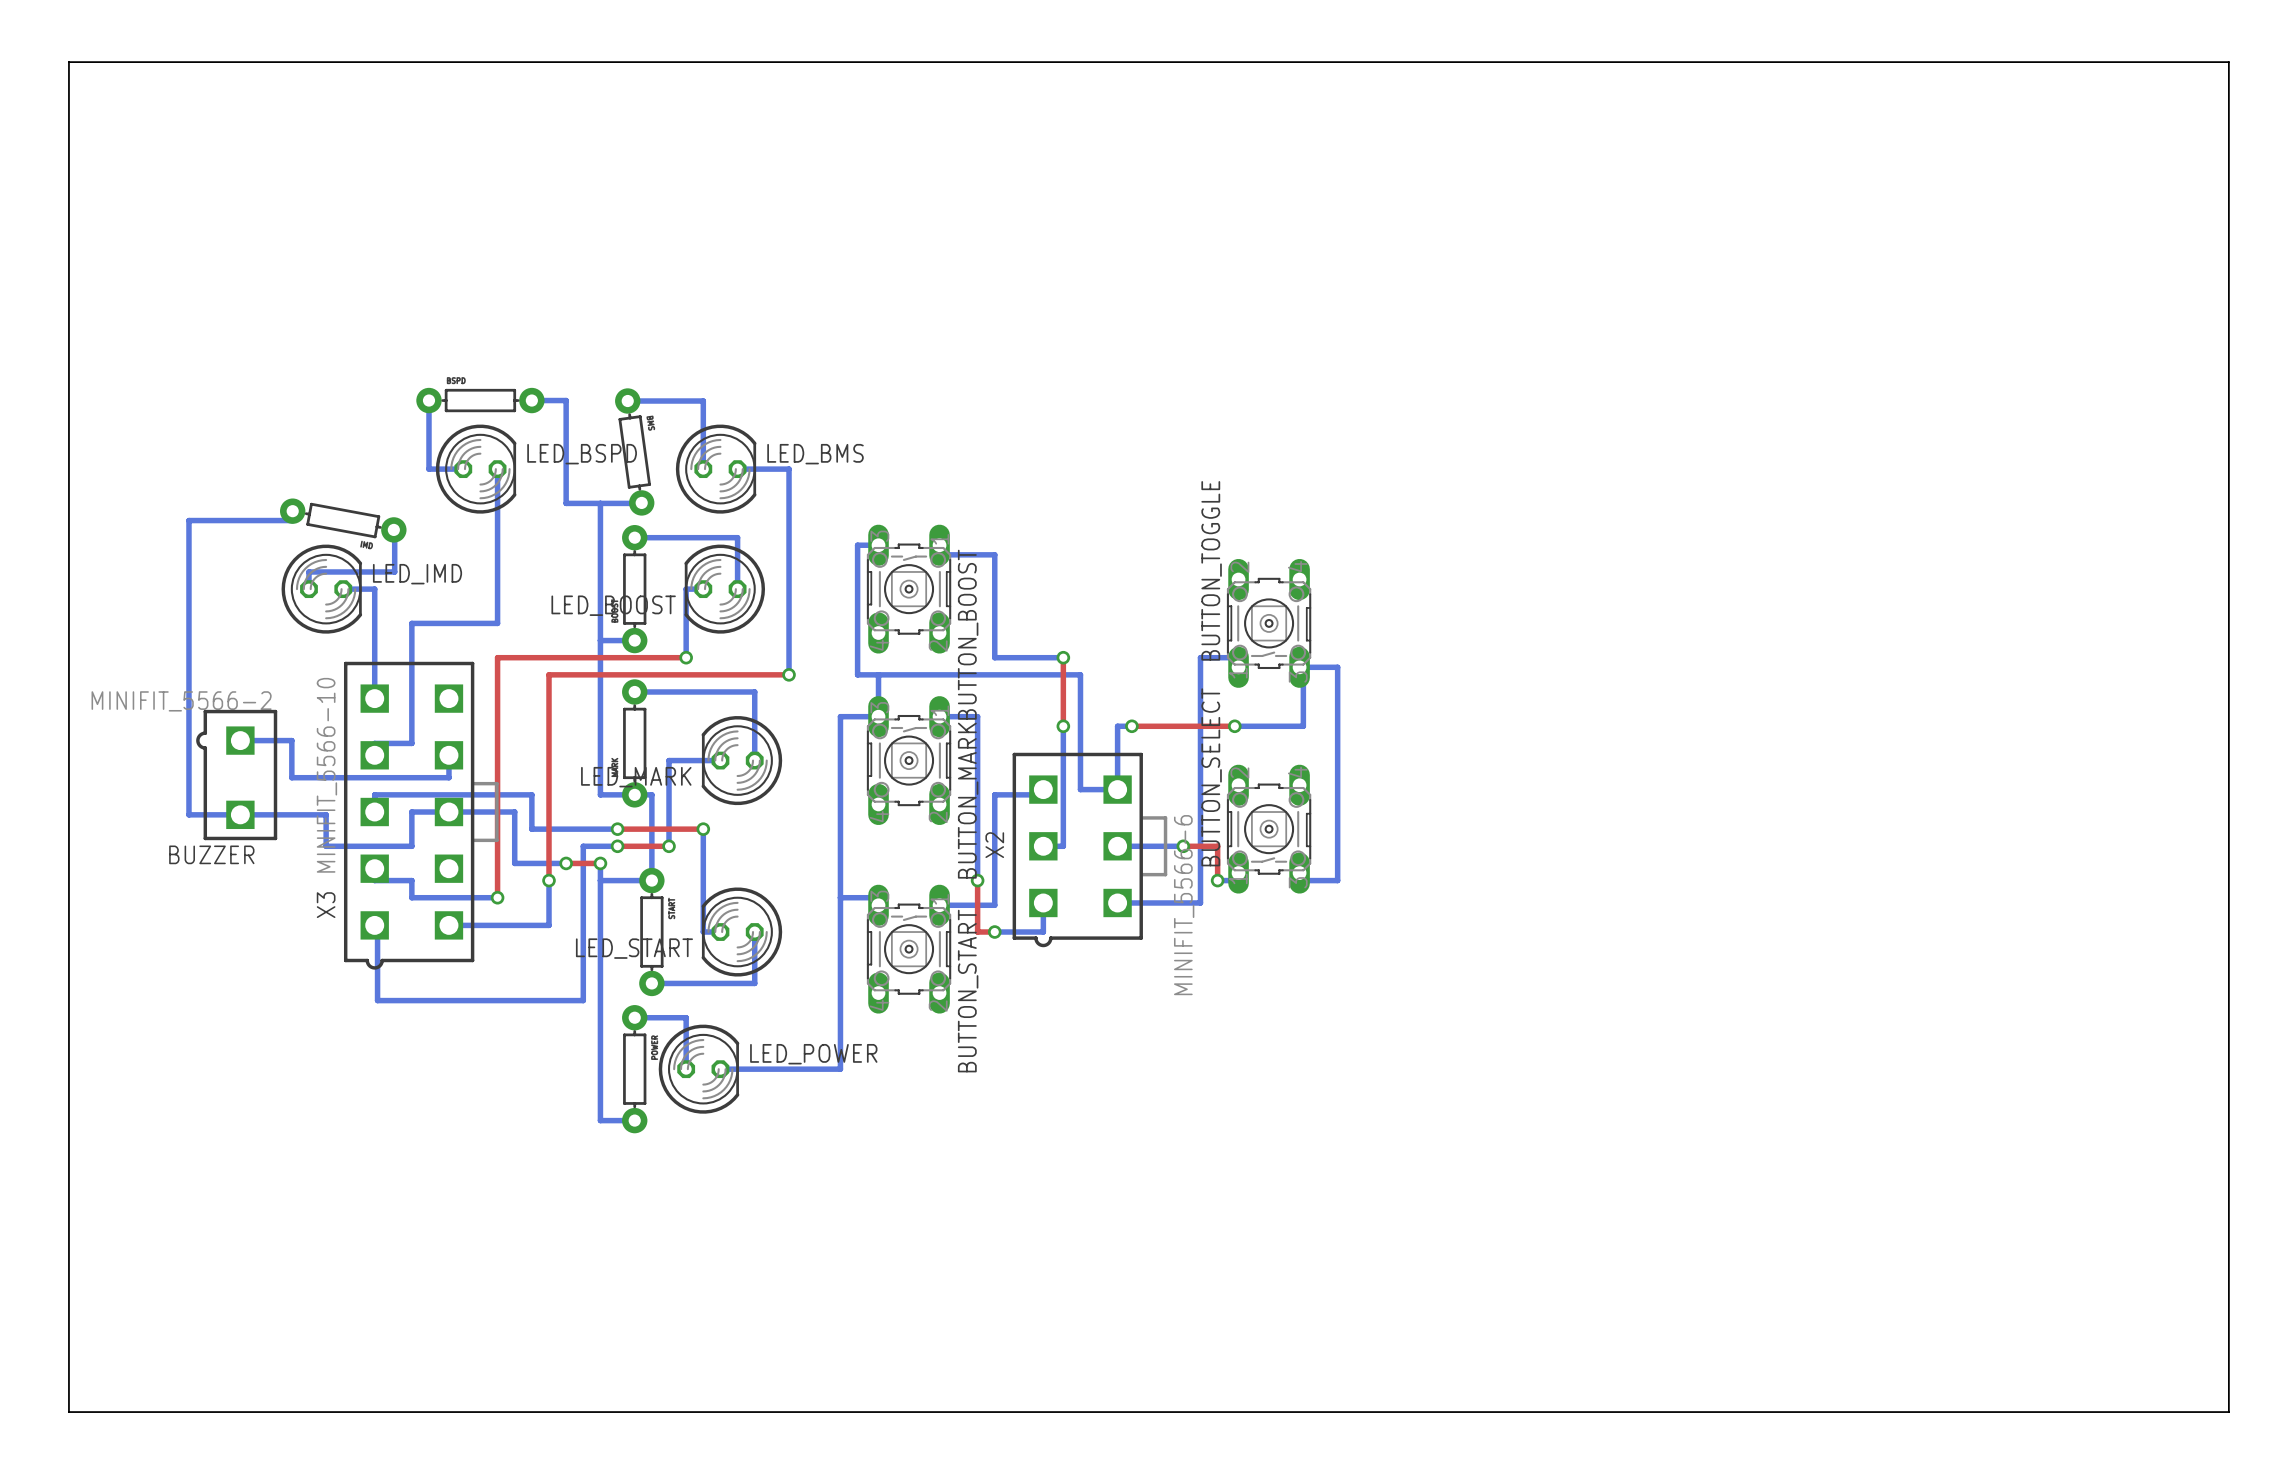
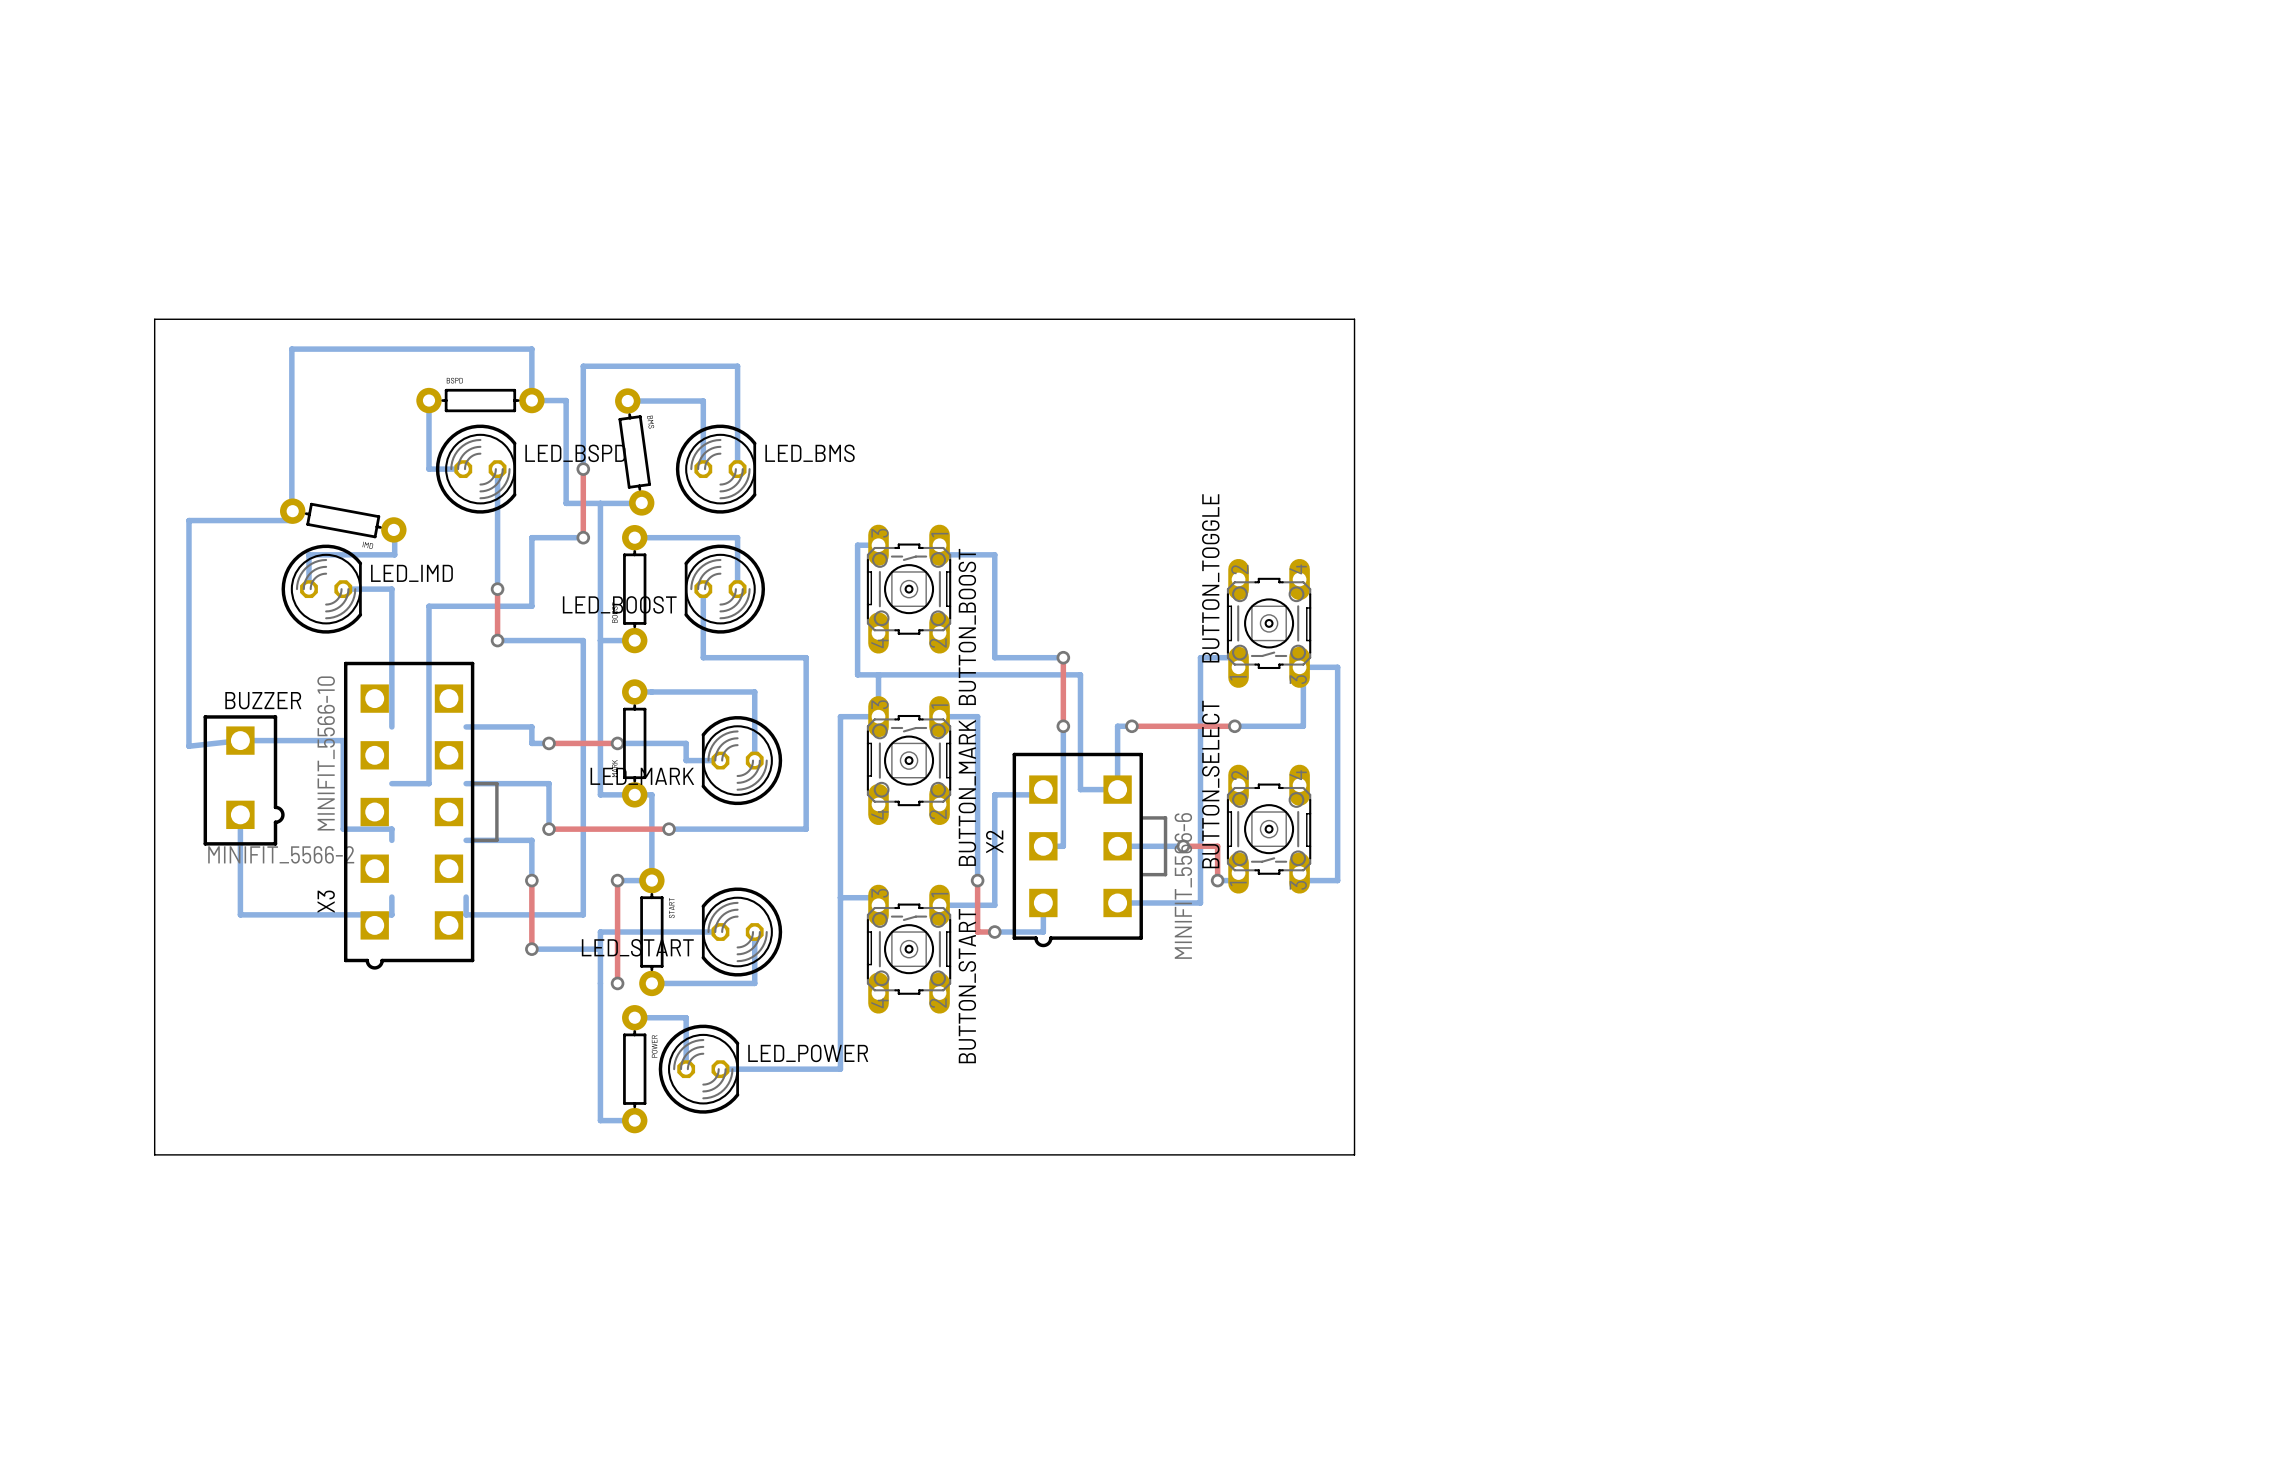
board edge: (68, 62) (2228, 62) (2228, 1412) (68, 1412) (68, 62) -> none
board edge: none -> (154, 319) (1354, 319) (1354, 1154) (154, 1154) (154, 319)
bottom track: none -> (531, 400) (531, 349) (291, 349) (292, 511)
top track: none -> (583, 469) (583, 537)
via: none -> (583, 469)
bottom track: (737, 469) (789, 469) (789, 674) -> (737, 469) (737, 366) (583, 366) (583, 469)
bottom track: none -> (583, 537) (531, 537) (531, 606) (428, 606) (428, 783) (391, 783)
via: none -> (583, 537)
bottom track: (394, 554) (394, 571) (308, 571) -> (394, 554) (308, 554) (308, 571)
bottom track: (374, 589) (374, 698) -> (374, 589) (391, 589) (391, 726)
bottom track: (497, 589) (497, 623) (411, 623) (411, 743) (374, 743) (374, 755) -> none
top track: none -> (497, 589) (497, 640)
via: none -> (497, 589)
bottom track: (703, 589) (686, 589) (686, 657) -> (703, 589) (703, 657) (806, 657) (806, 829) (669, 829)
via: none -> (497, 640)
top track: (686, 657) (497, 657) (497, 897) -> none
via: (686, 657) -> none
top track: (789, 674) (549, 674) (549, 880) -> none
via: (789, 674) -> none
bottom track: none -> (466, 726) (531, 726) (531, 743) (549, 743)
bottom track: (291, 740) (291, 777) (448, 777) (448, 755) -> (291, 740) (343, 740) (343, 829) (391, 829) (391, 840)
top track: none -> (549, 743) (617, 743)
via: none -> (549, 743)
via: none -> (617, 743)
bottom track: (188, 746) (188, 814) (326, 814) (326, 846) (411, 846) (411, 812) (514, 812) (514, 863) (566, 863) -> (188, 746) (240, 740)
bottom track: (686, 760) (669, 760) (669, 846) -> (686, 760) (686, 743) (617, 743)
BUZZER rotation: 0° (236, 775) -> 180° (244, 780)
bottom track: none -> (466, 783) (549, 783) (549, 829)
bottom track: (374, 812) (374, 794) (531, 794) (531, 829) (617, 829) -> none
bottom track: none -> (240, 814) (240, 914) (391, 914) (391, 897)
top track: none -> (549, 829) (617, 829)
via: none -> (549, 829)
via: (617, 829) -> none
top track: (669, 829) (703, 829) -> none
via: none -> (669, 829)
bottom track: (703, 829) (703, 932) -> none
via: (703, 829) -> none
bottom track: none -> (466, 840) (531, 840) (531, 880)
bottom track: (583, 846) (617, 846) -> (583, 846) (583, 640) (497, 640)
top track: (617, 846) (669, 846) -> none
via: (617, 846) -> none
via: (669, 846) -> none
top track: (566, 863) (600, 863) -> none
via: (566, 863) -> none
bottom track: (600, 863) (600, 932) -> (703, 932) (600, 932)
via: (600, 863) -> none
bottom track: (374, 868) (374, 880) (411, 880) (411, 897) (497, 897) -> none
top track: none -> (531, 880) (531, 949)
bottom track: (549, 880) (549, 925) (448, 925) -> none
via position: (549, 880) -> (531, 880)
bottom track: (600, 880) (617, 880) -> none
top track: none -> (617, 880) (617, 983)
via: none -> (617, 880)
via: (497, 897) -> none
bottom track: (583, 914) (583, 1000) (377, 1000) (377, 925) (374, 925) -> (583, 914) (466, 914) (466, 897)
bottom track: none -> (531, 949) (600, 949)
via: none -> (531, 949)
via: none -> (617, 983)

